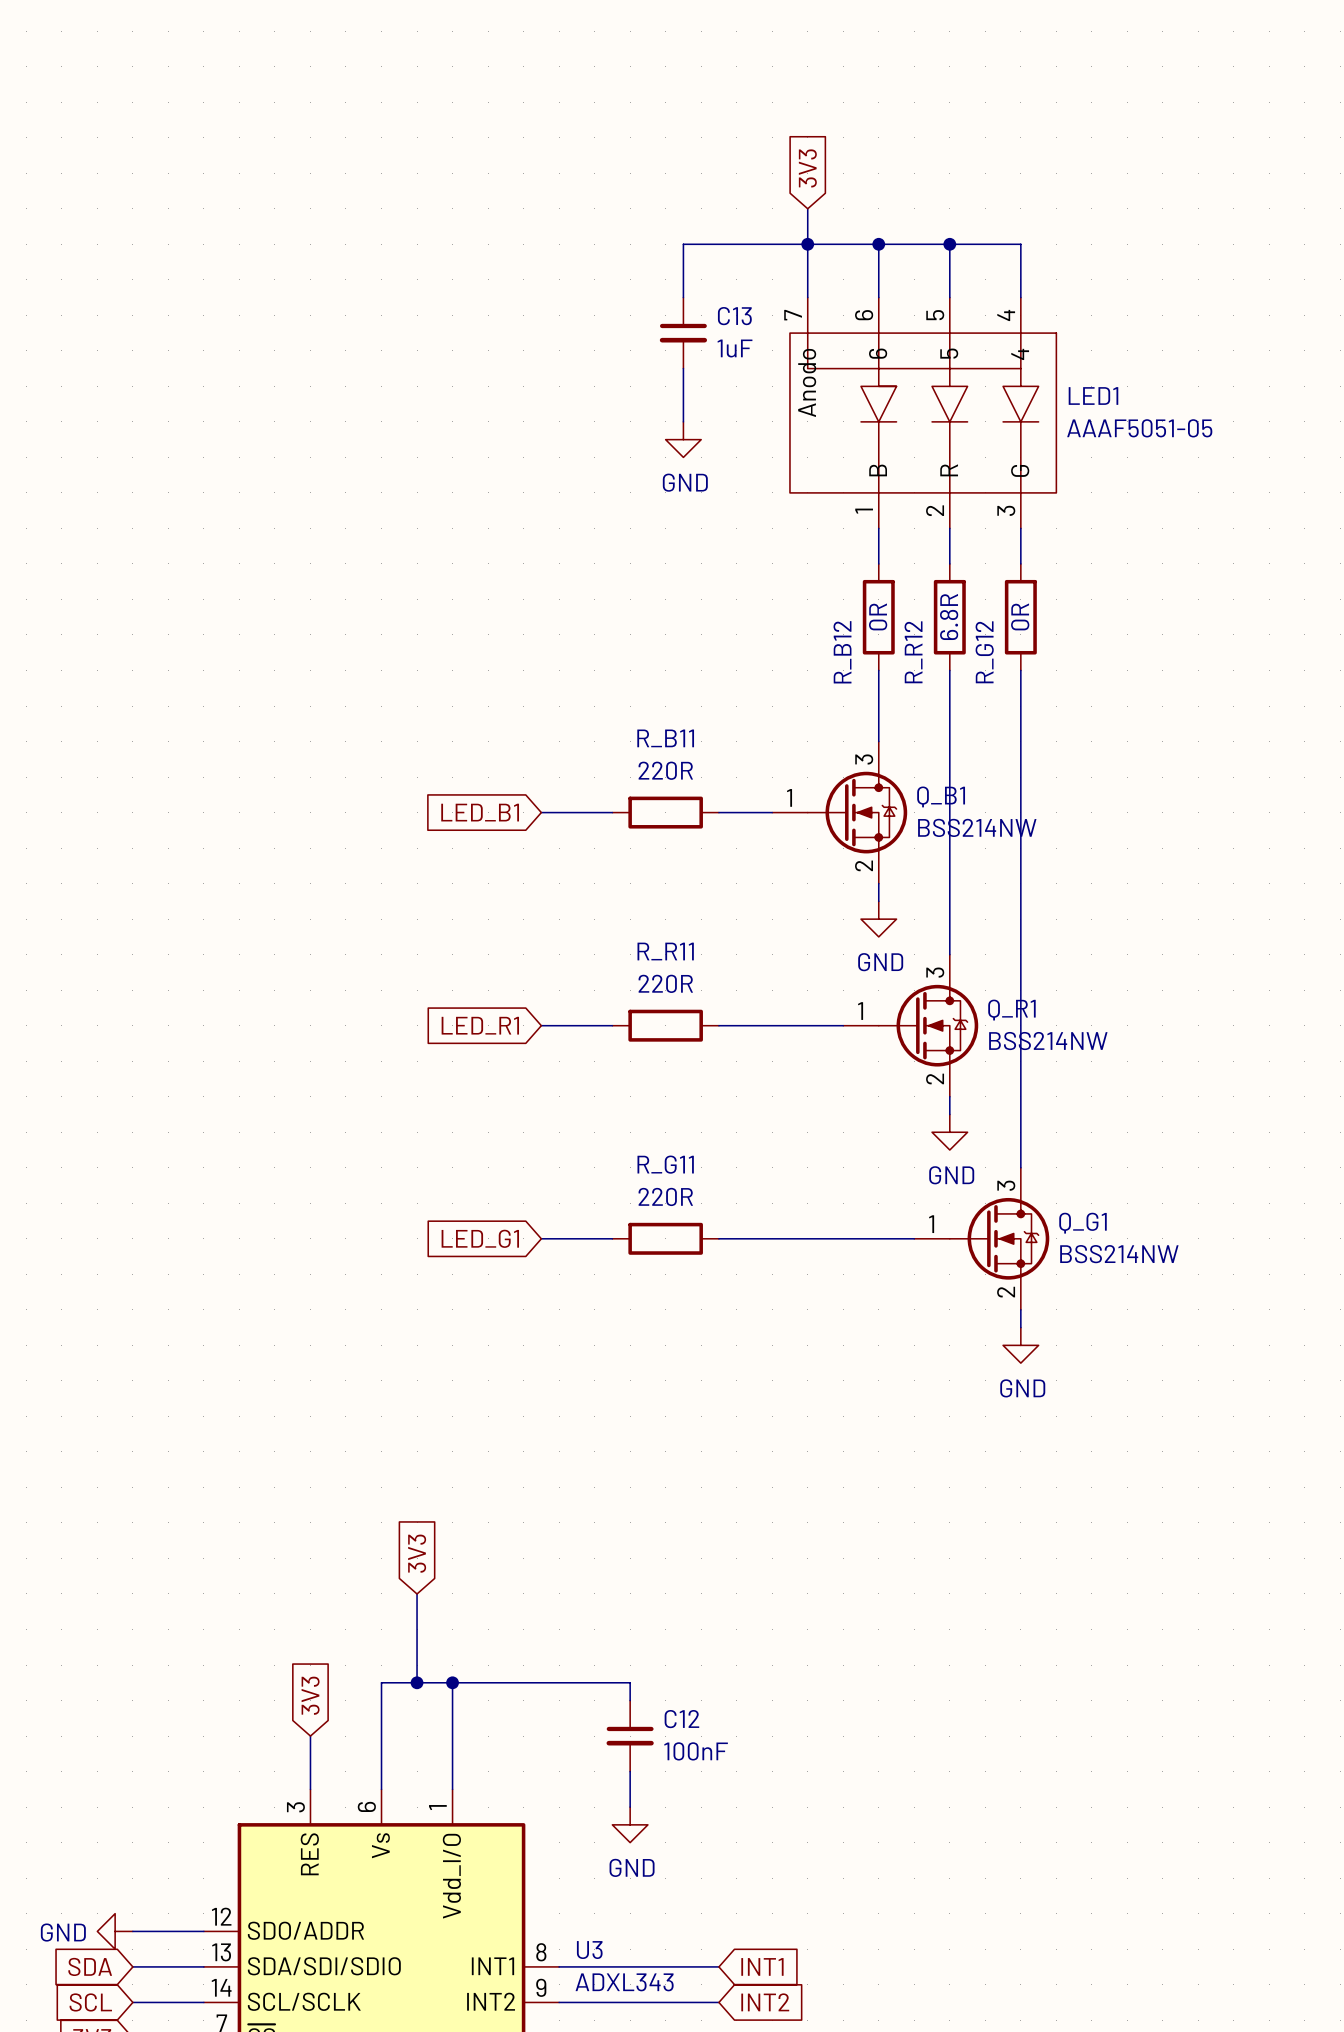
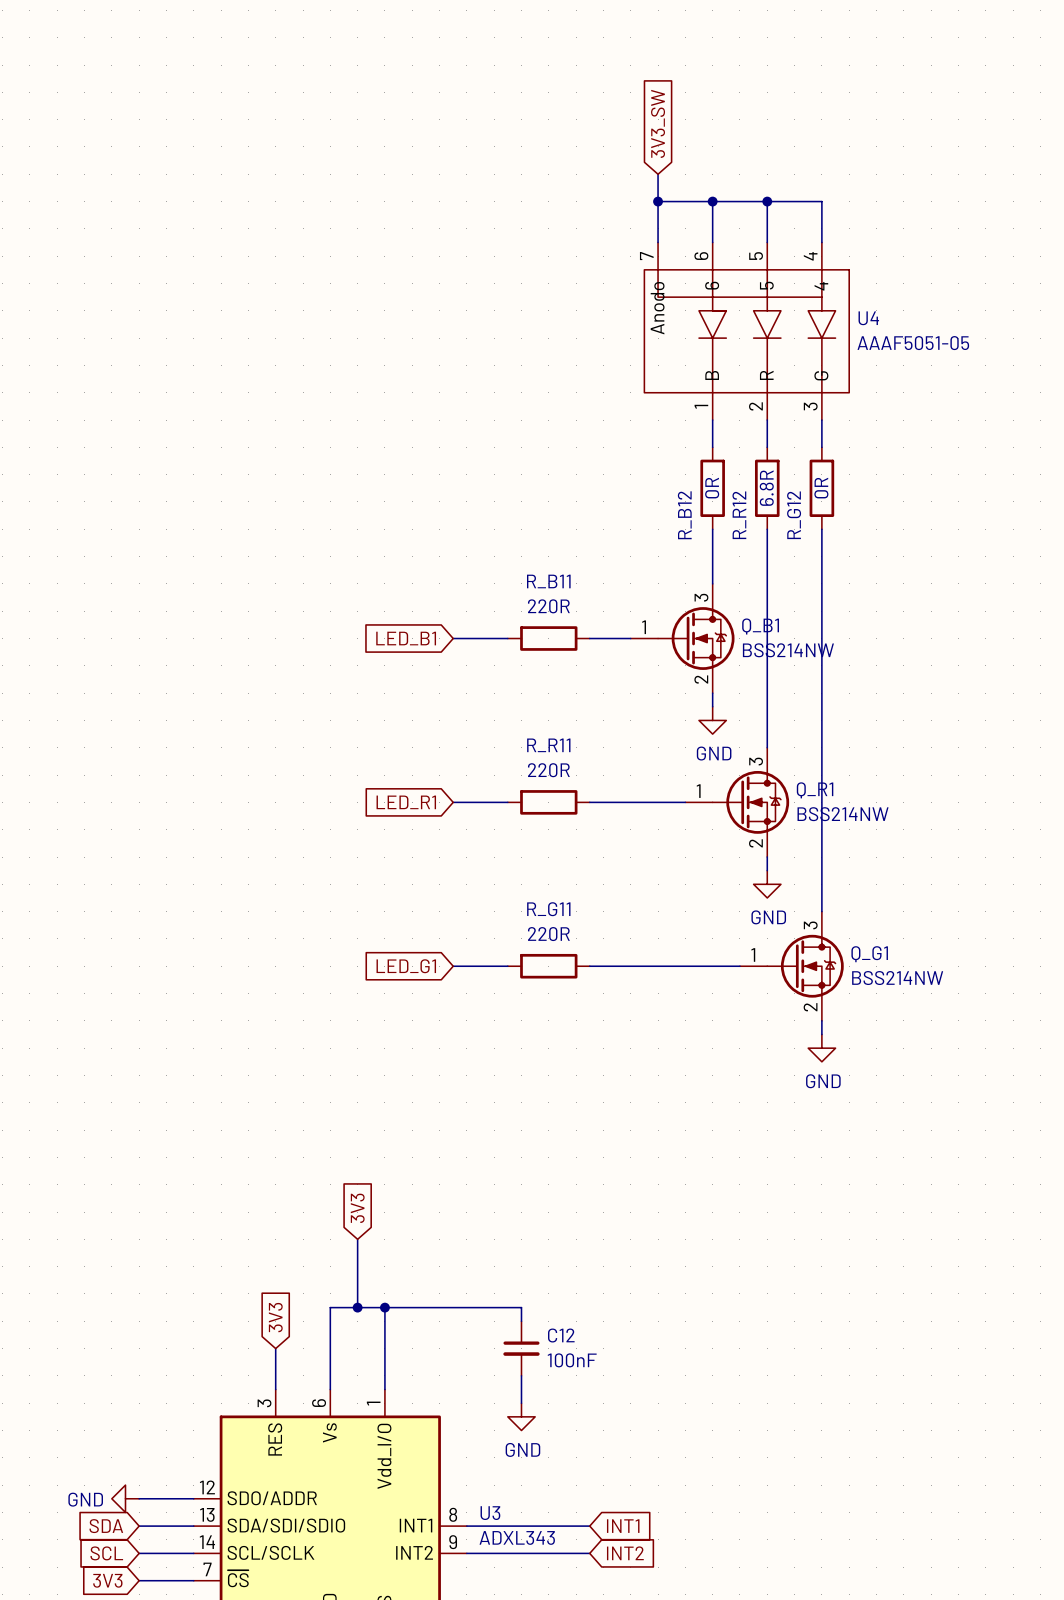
global label: 3V3 (807, 168) -> 3V3_SW (658, 123)
wire: (807, 244) (683, 244) (683, 297) -> none
C13: 1uF (683, 333) -> none
wire: (683, 368) (683, 421) -> none
LED1 name: LED1 (1093, 396) -> U4 (868, 318)
power symbol: GND (683, 439) -> none

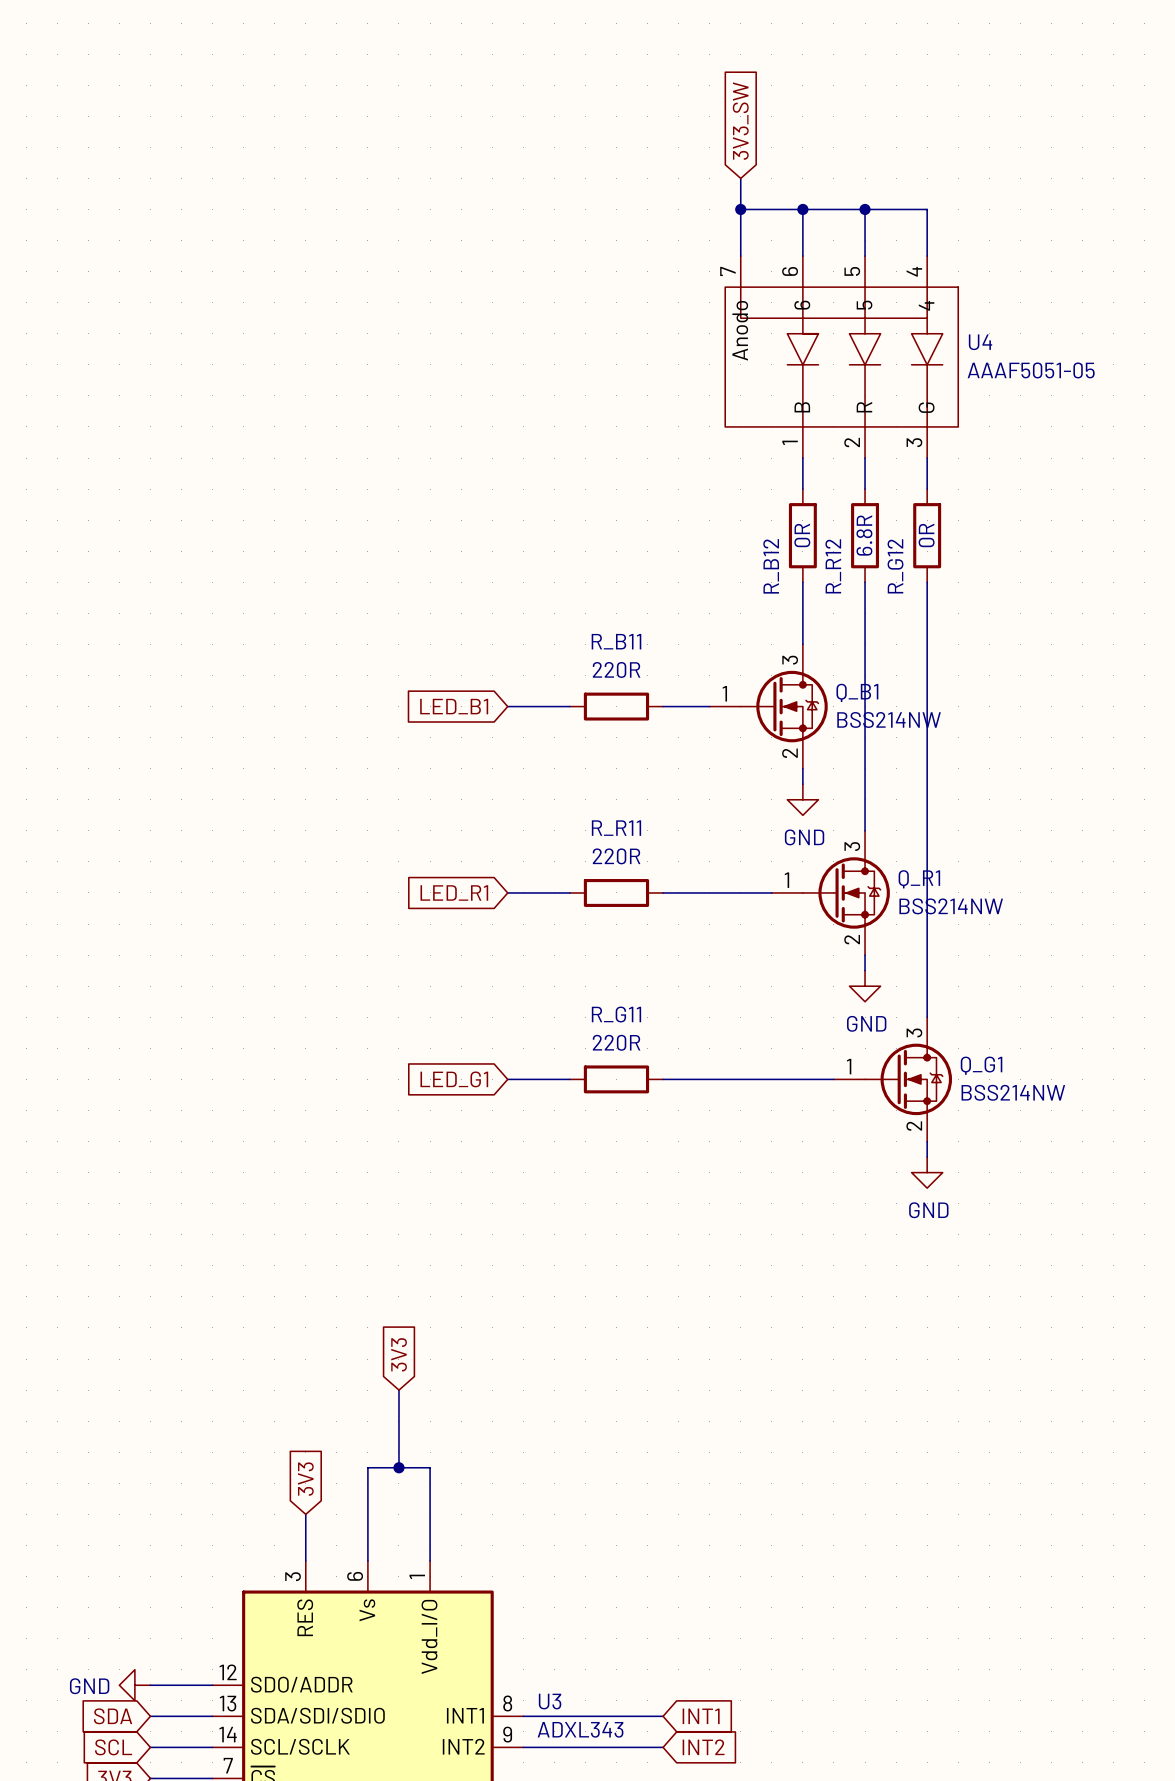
wire: (384, 1307) (521, 1307) (521, 1321) -> none
junction: (384, 1307) -> none
C12: 100nF (521, 1348) -> none
wire: (521, 1375) (521, 1403) -> none
power symbol: GND (521, 1416) -> none

